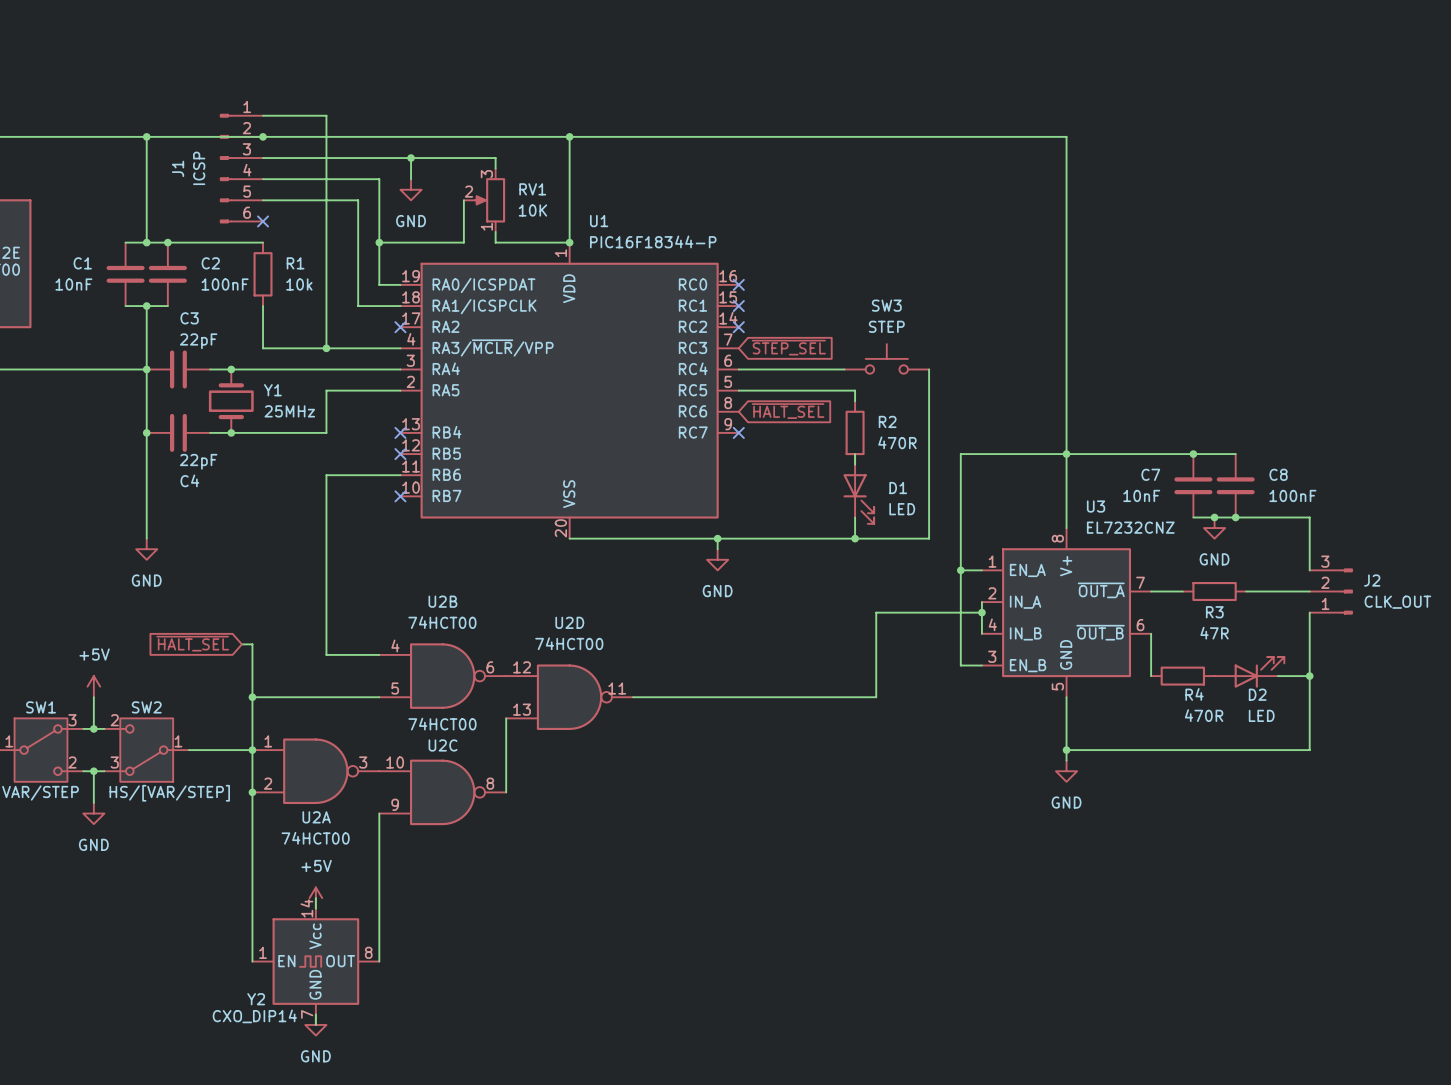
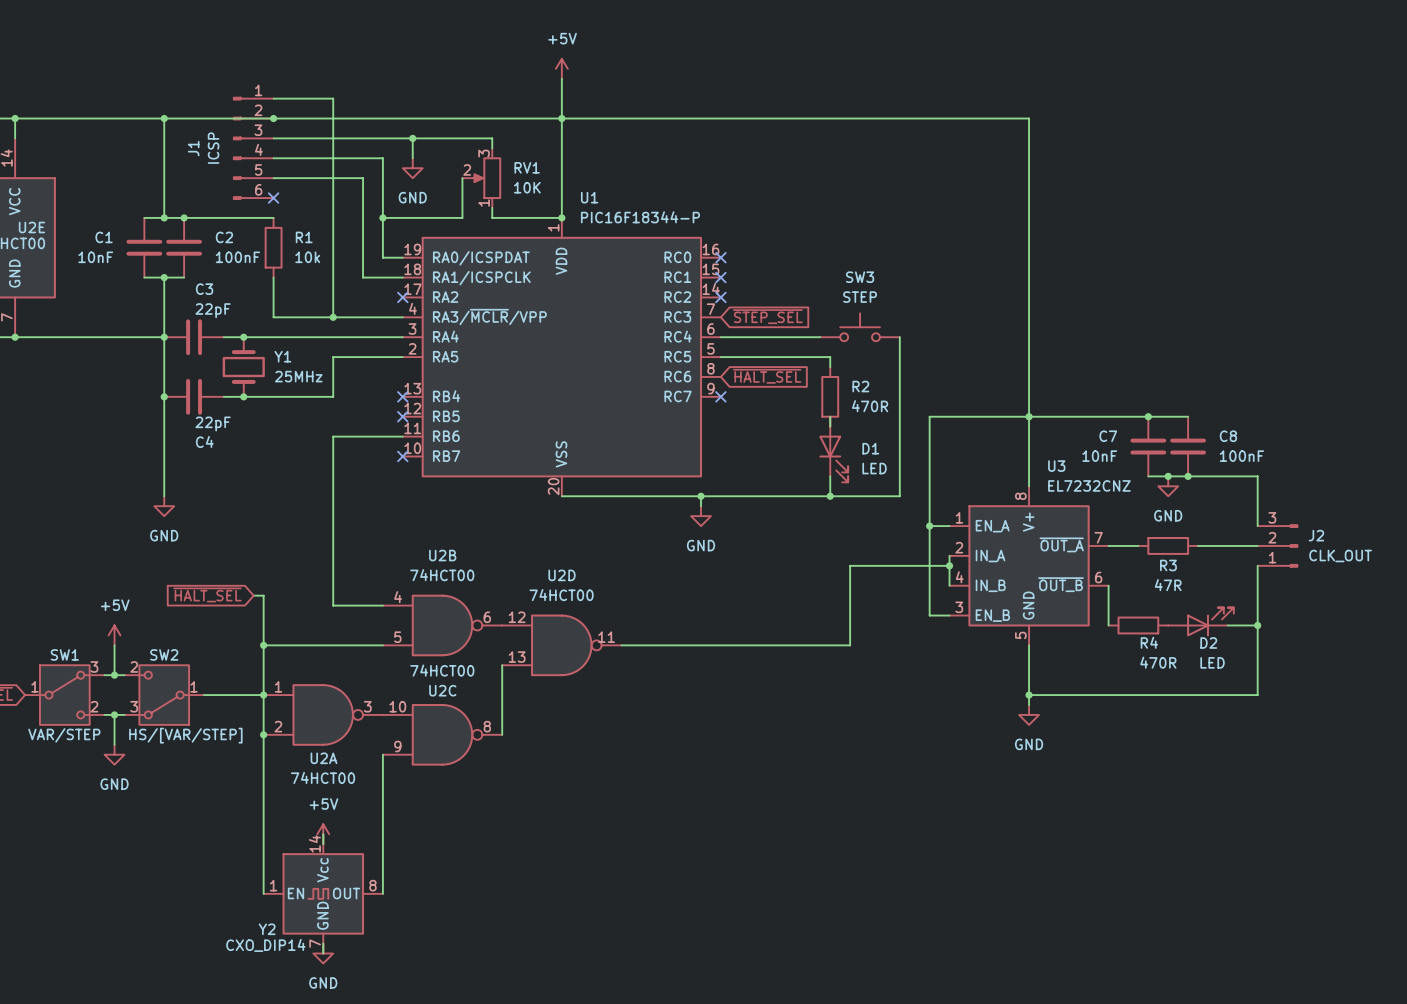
power symbol: none -> +5V (561, 68)
wire: none -> (561, 78) (561, 118)

